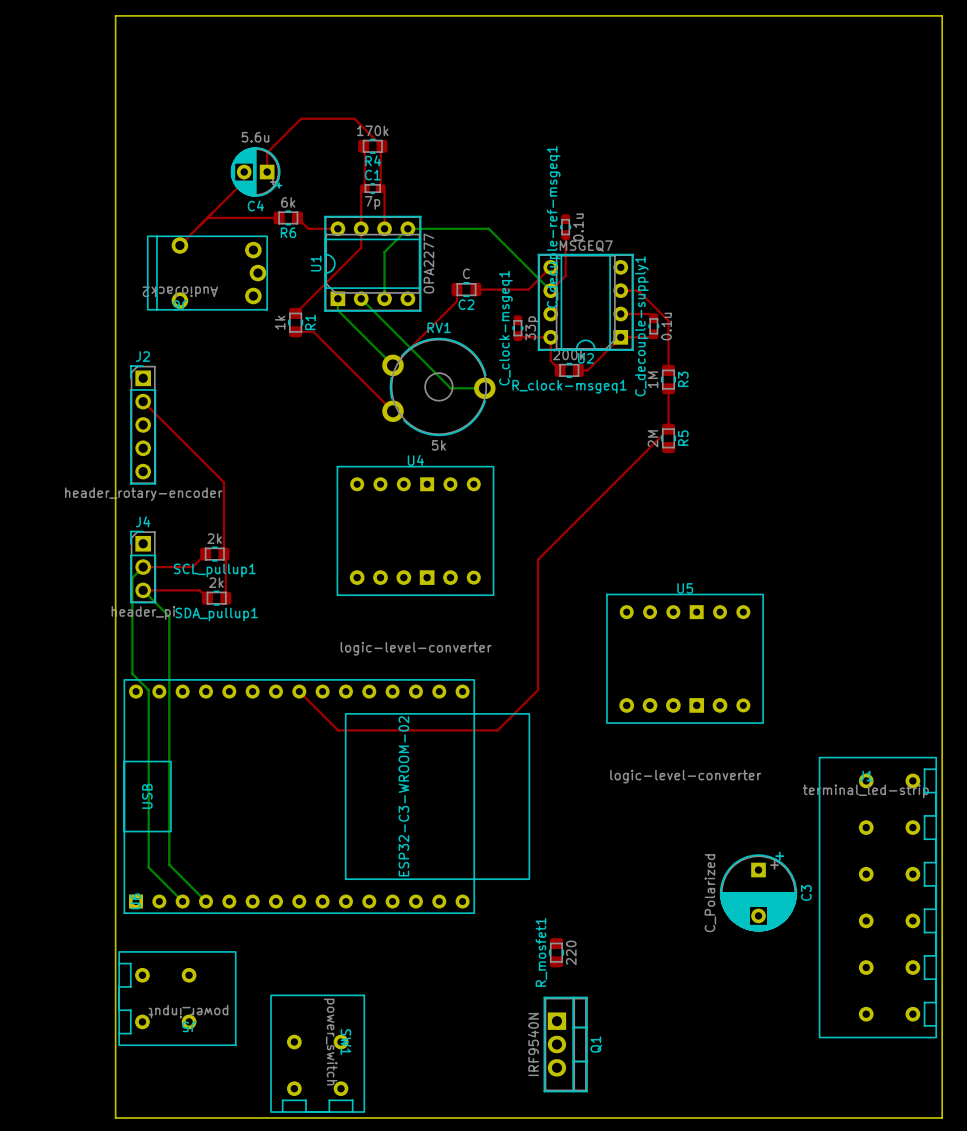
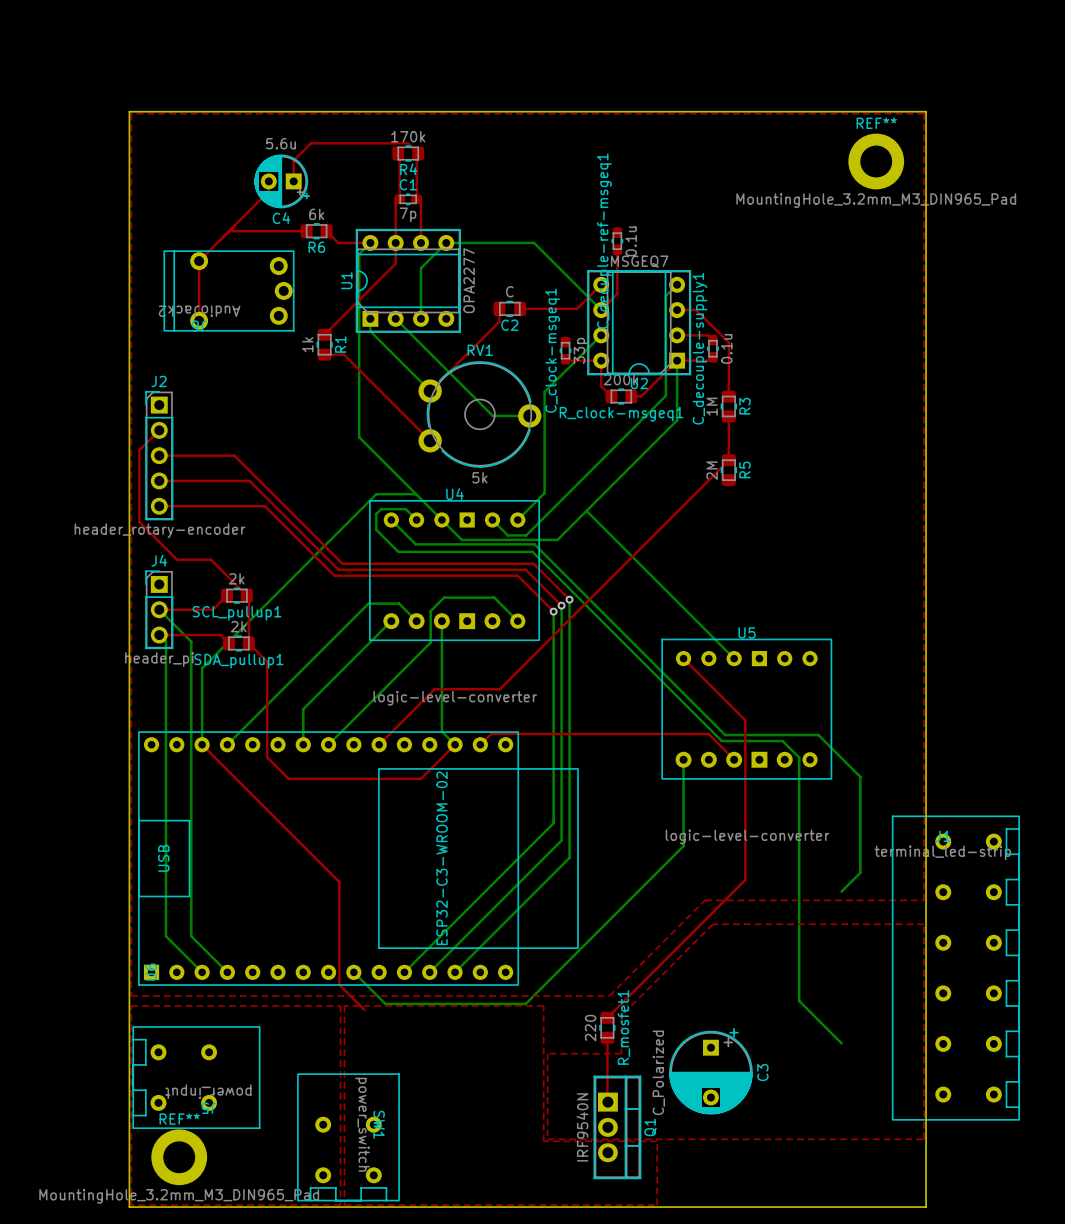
board edge: (115, 107) (115, 15) (942, 15) (942, 1117) (850, 1117) -> (129, 111) (926, 111) (926, 1207)
top zone outline: none -> (131, 113) (131, 995) (609, 995) (704, 900) (924, 900) (924, 113) (131, 113)
top track: (283, 136) (301, 118) (354, 118) (372, 136) -> (310, 143) (407, 143)
REF**: none -> MountingHole_3.2mm_M3_DIN965_Pad (876, 161)
bottom track: none -> (370, 242) (359, 254) (359, 437) (461, 539) (557, 539) (677, 420) (677, 360)
top track: none -> (199, 261) (199, 320)
bottom track: none -> (677, 284) (665, 295) (665, 395) (526, 535) (507, 535) (492, 519)
bottom track: none -> (601, 335) (544, 391) (544, 493) (517, 519)
top track: (143, 401) (224, 482) (224, 554) -> (159, 430) (139, 450) (139, 521) (177, 559) (211, 559) (246, 595)
top track: none -> (159, 455) (234, 455) (342, 563) (533, 563) (569, 599)
top track: none -> (159, 480) (249, 480) (338, 569) (525, 569) (561, 605)
bottom track: none -> (416, 494) (376, 494) (202, 668) (202, 744)
top track: none -> (159, 506) (265, 506) (334, 575) (517, 575) (553, 611)
bottom track: none -> (587, 511) (734, 658)
bottom track: none -> (391, 519) (415, 544) (534, 544) (725, 735) (818, 735) (860, 776) (860, 872) (841, 891)
bottom track: none -> (416, 519) (405, 509) (381, 509) (376, 514) (376, 529) (398, 551) (532, 551) (721, 741) (782, 741) (799, 757) (799, 1000) (841, 1043)
bottom track: none -> (569, 599) (569, 857) (455, 972)
via: none -> (569, 599)
top track: (538, 559) (538, 690) (497, 730) (338, 730) (299, 691) -> (587, 601) (499, 689) (434, 689) (379, 744)
bottom track: none -> (561, 605) (561, 840) (429, 972)
via: none -> (561, 605)
bottom track: (143, 567) (132, 577) (132, 673) (148, 690) (149, 868) -> (159, 609) (191, 641) (191, 936)
bottom track: none -> (553, 611) (553, 823) (404, 972)
via: none -> (553, 611)
bottom track: none -> (391, 621) (303, 709) (303, 744)
bottom track: none -> (416, 621) (399, 603) (368, 603) (227, 744)
bottom track: none -> (441, 621) (441, 731) (455, 744)
bottom track: none -> (517, 621) (494, 597) (444, 597) (430, 611) (430, 642) (328, 744)
bottom track: (149, 596) (169, 616) (169, 864) (172, 868) -> (166, 641) (166, 936)
top track: none -> (248, 643) (267, 661) (267, 757) (288, 778) (420, 778) (455, 744)
top track: none -> (683, 658) (745, 720) (745, 879) (607, 1017)
top track: none -> (202, 744) (339, 882) (339, 984) (364, 1009)
top track: none -> (480, 744) (491, 733) (708, 733) (734, 759)
bottom track: none -> (683, 759) (683, 846) (525, 1003) (385, 1003) (353, 972)
top zone outline: none -> (712, 924) (924, 924) (924, 1139) (547, 1139) (547, 1053) (621, 1053) (621, 1015) (712, 924)
C3 position: (758, 891) -> (710, 1071)
top zone outline: none -> (131, 1005) (340, 1005) (340, 1205) (131, 1205) (131, 1005)
top zone outline: none -> (344, 1005) (543, 1005) (543, 1141) (657, 1141) (657, 1205) (344, 1205) (344, 1005)
R_mosfet1 name position: R_mosfet1 (541, 952) -> R_mosfet1 (623, 1027)
R_mosfet1 value position: 220 (571, 952) -> 220 (590, 1028)
top track: none -> (607, 1037) (607, 1102)
REF**: none -> MountingHole_3.2mm_M3_DIN965_Pad (179, 1157)

